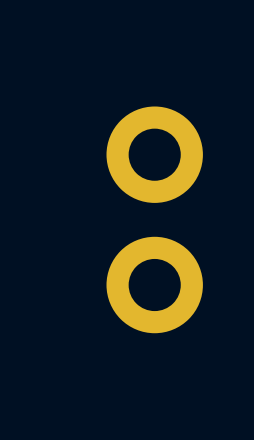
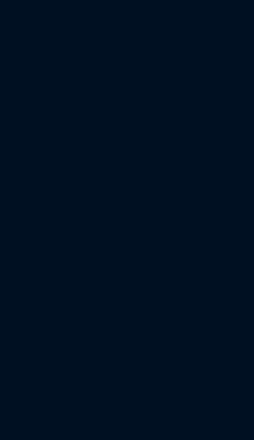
part: (154, 219) -> none

